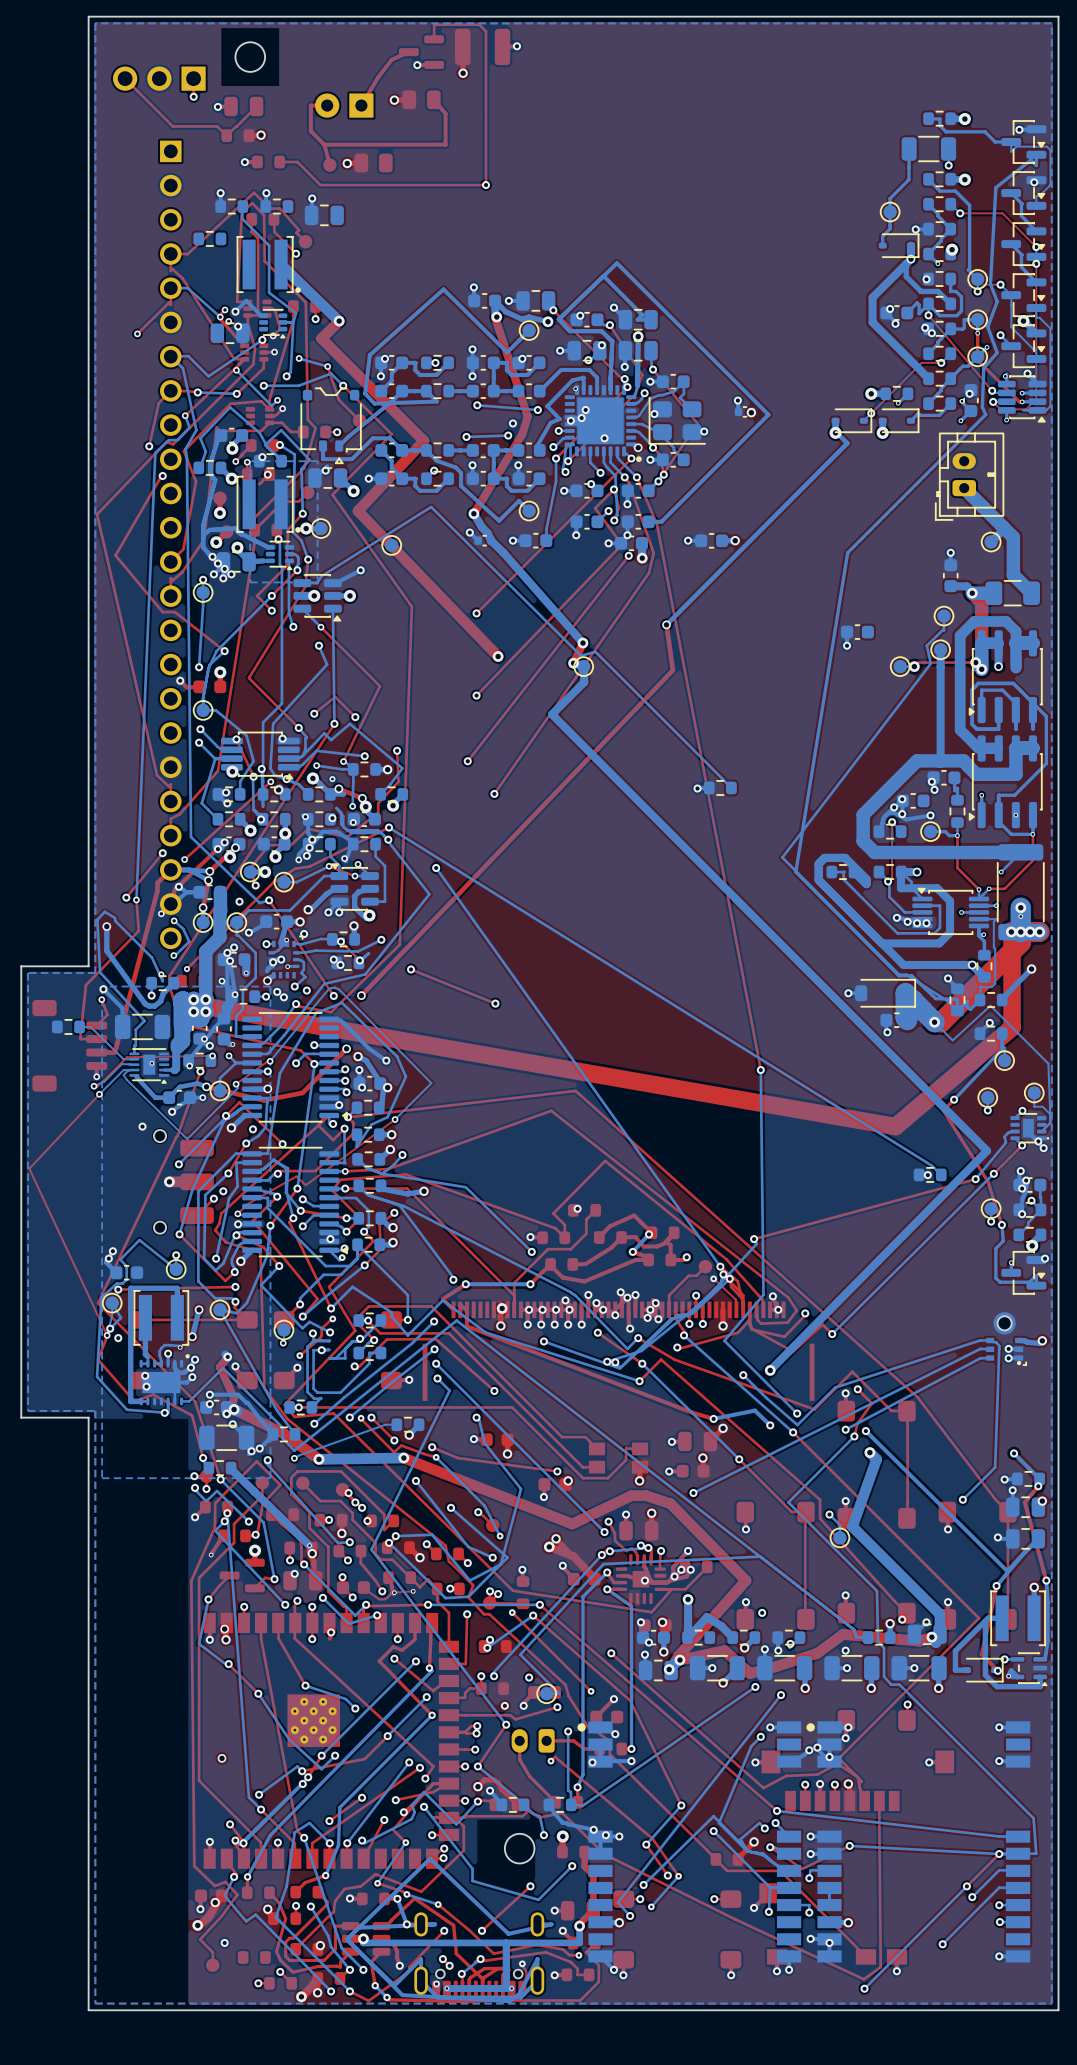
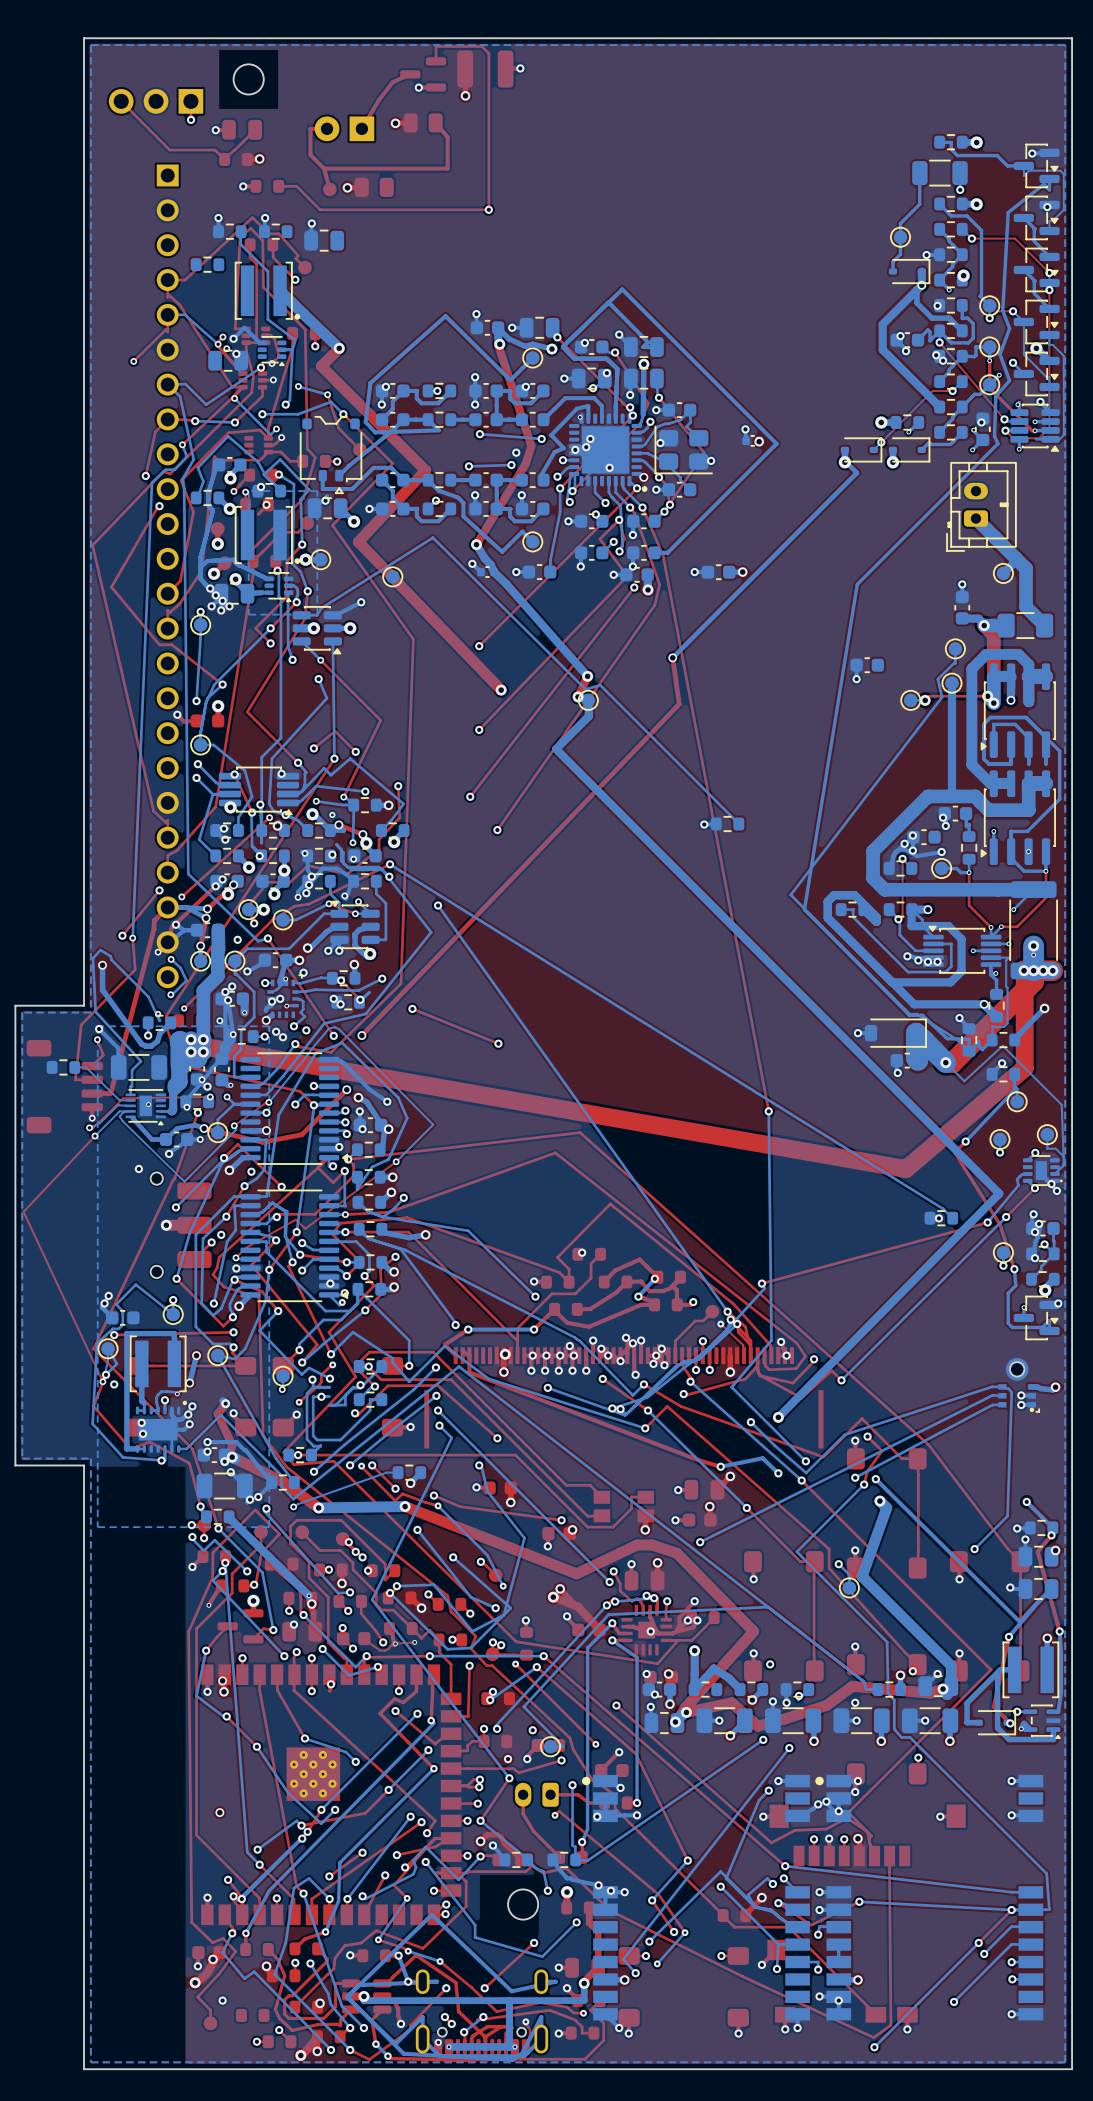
via: (674, 1576) -> none

